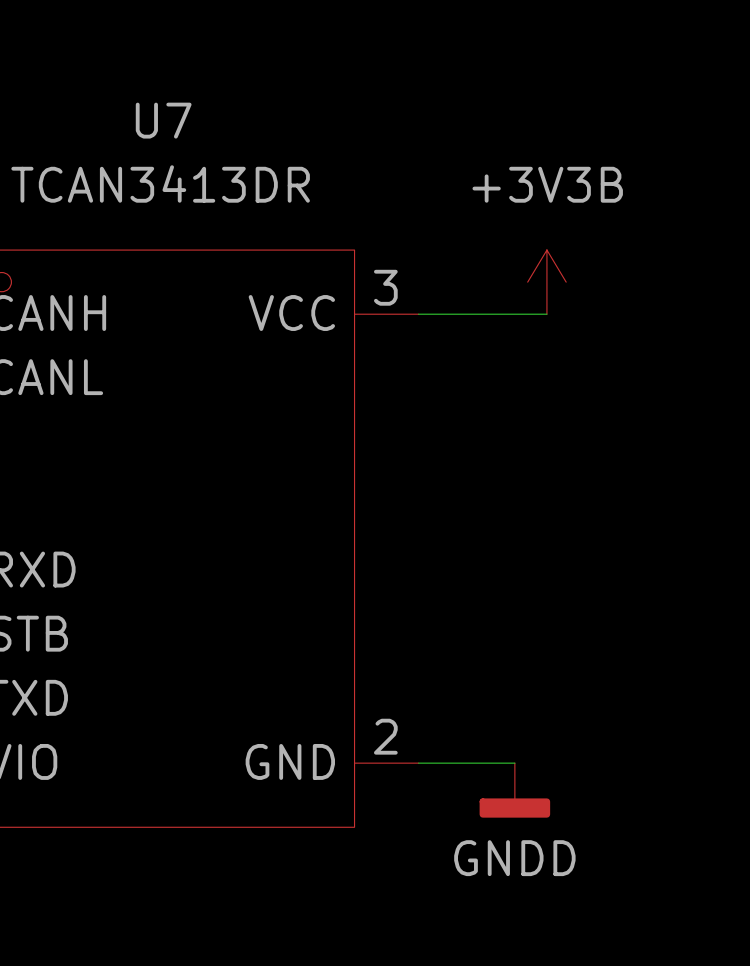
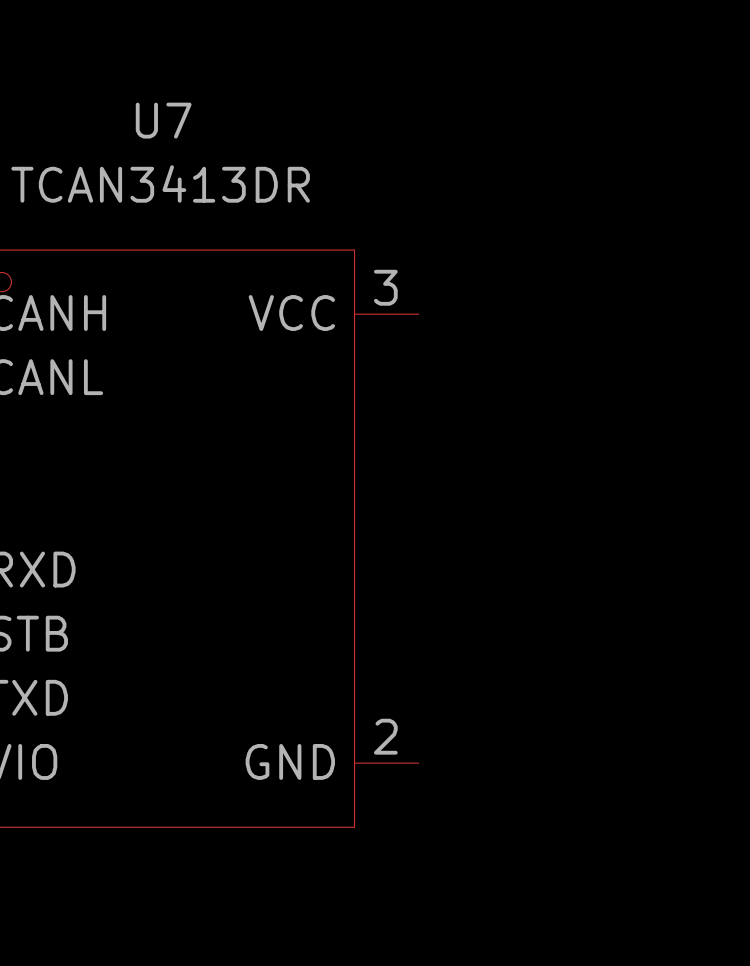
power symbol: +3V3B (546, 282) -> none
wire: (418, 314) (546, 314) -> none
wire: (418, 763) (514, 763) -> none
power symbol: GNDD (514, 790) -> none

